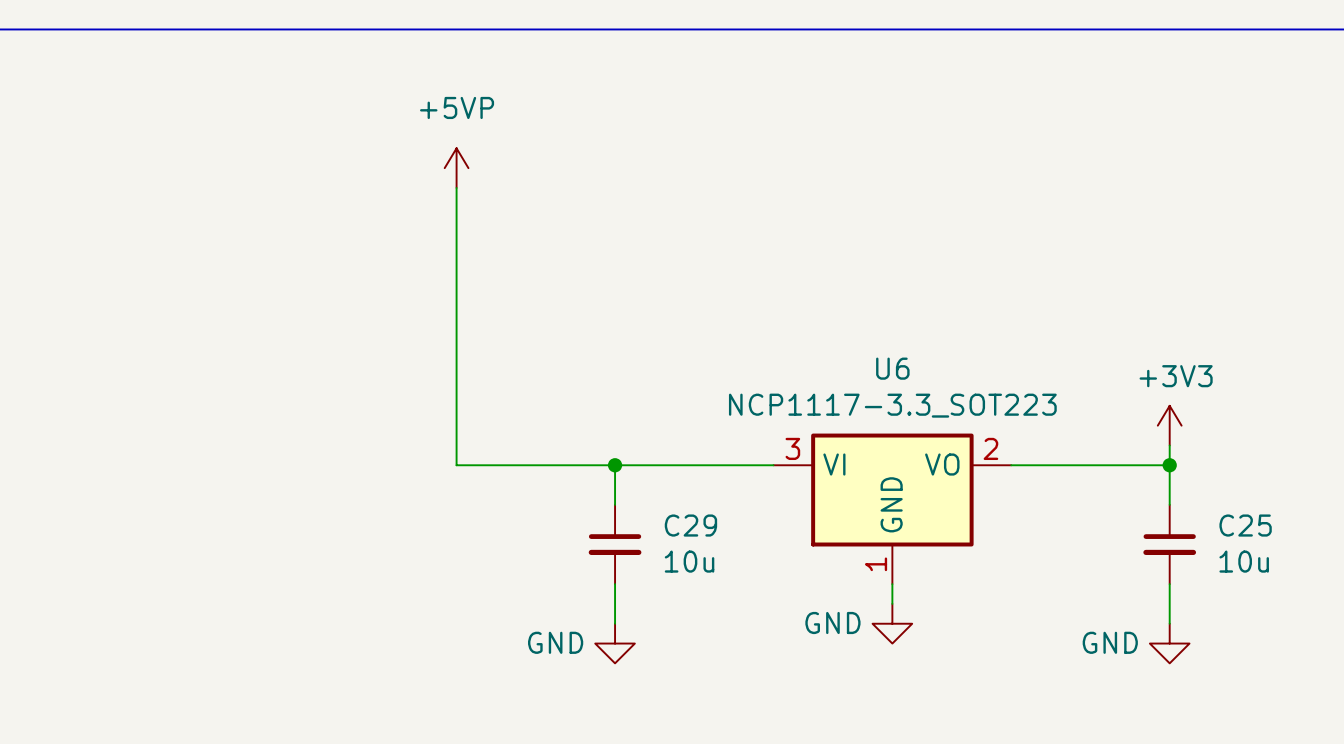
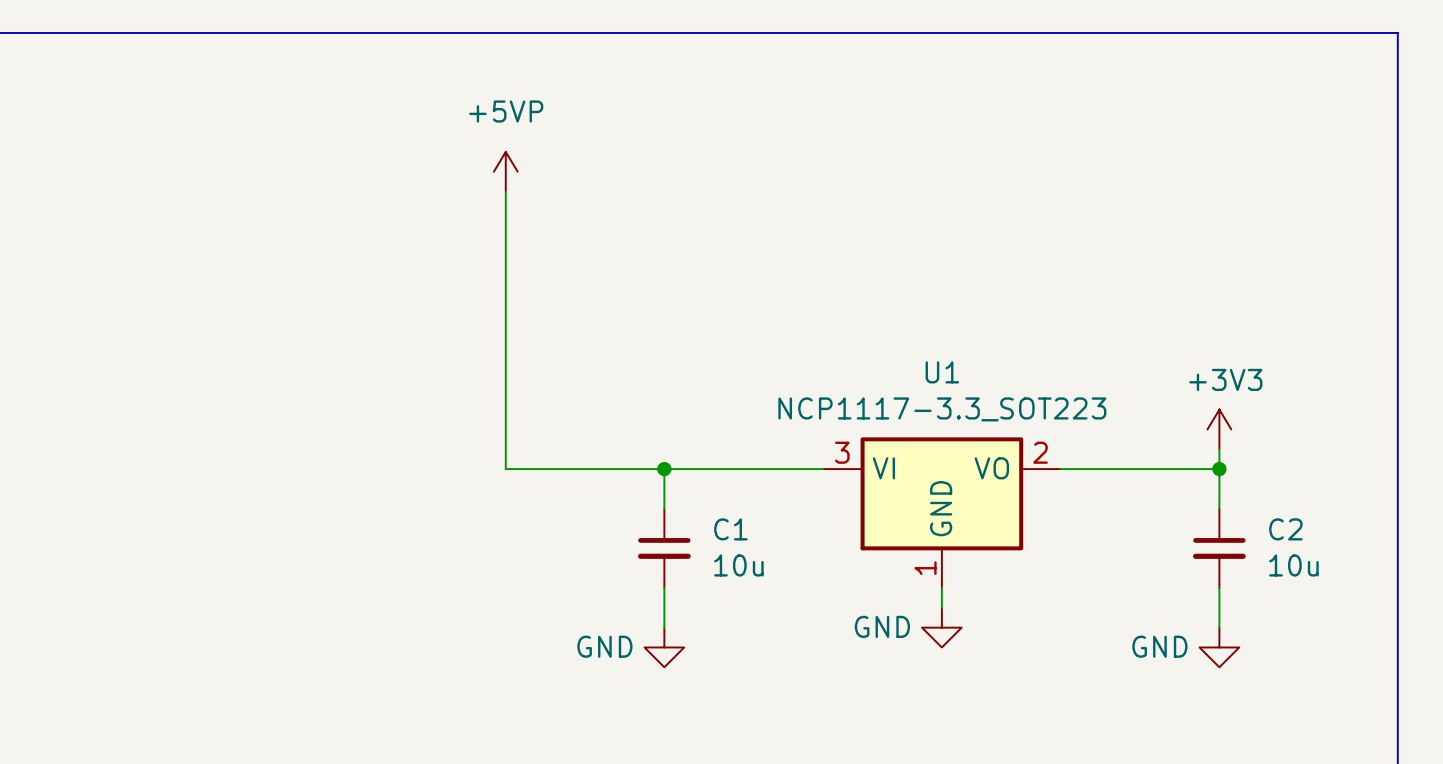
U6 name: U6 (892, 368) -> U1 (942, 372)
C29 name: C29 (690, 525) -> C1 (730, 529)
C25 name: C25 (1245, 525) -> C2 (1285, 529)

